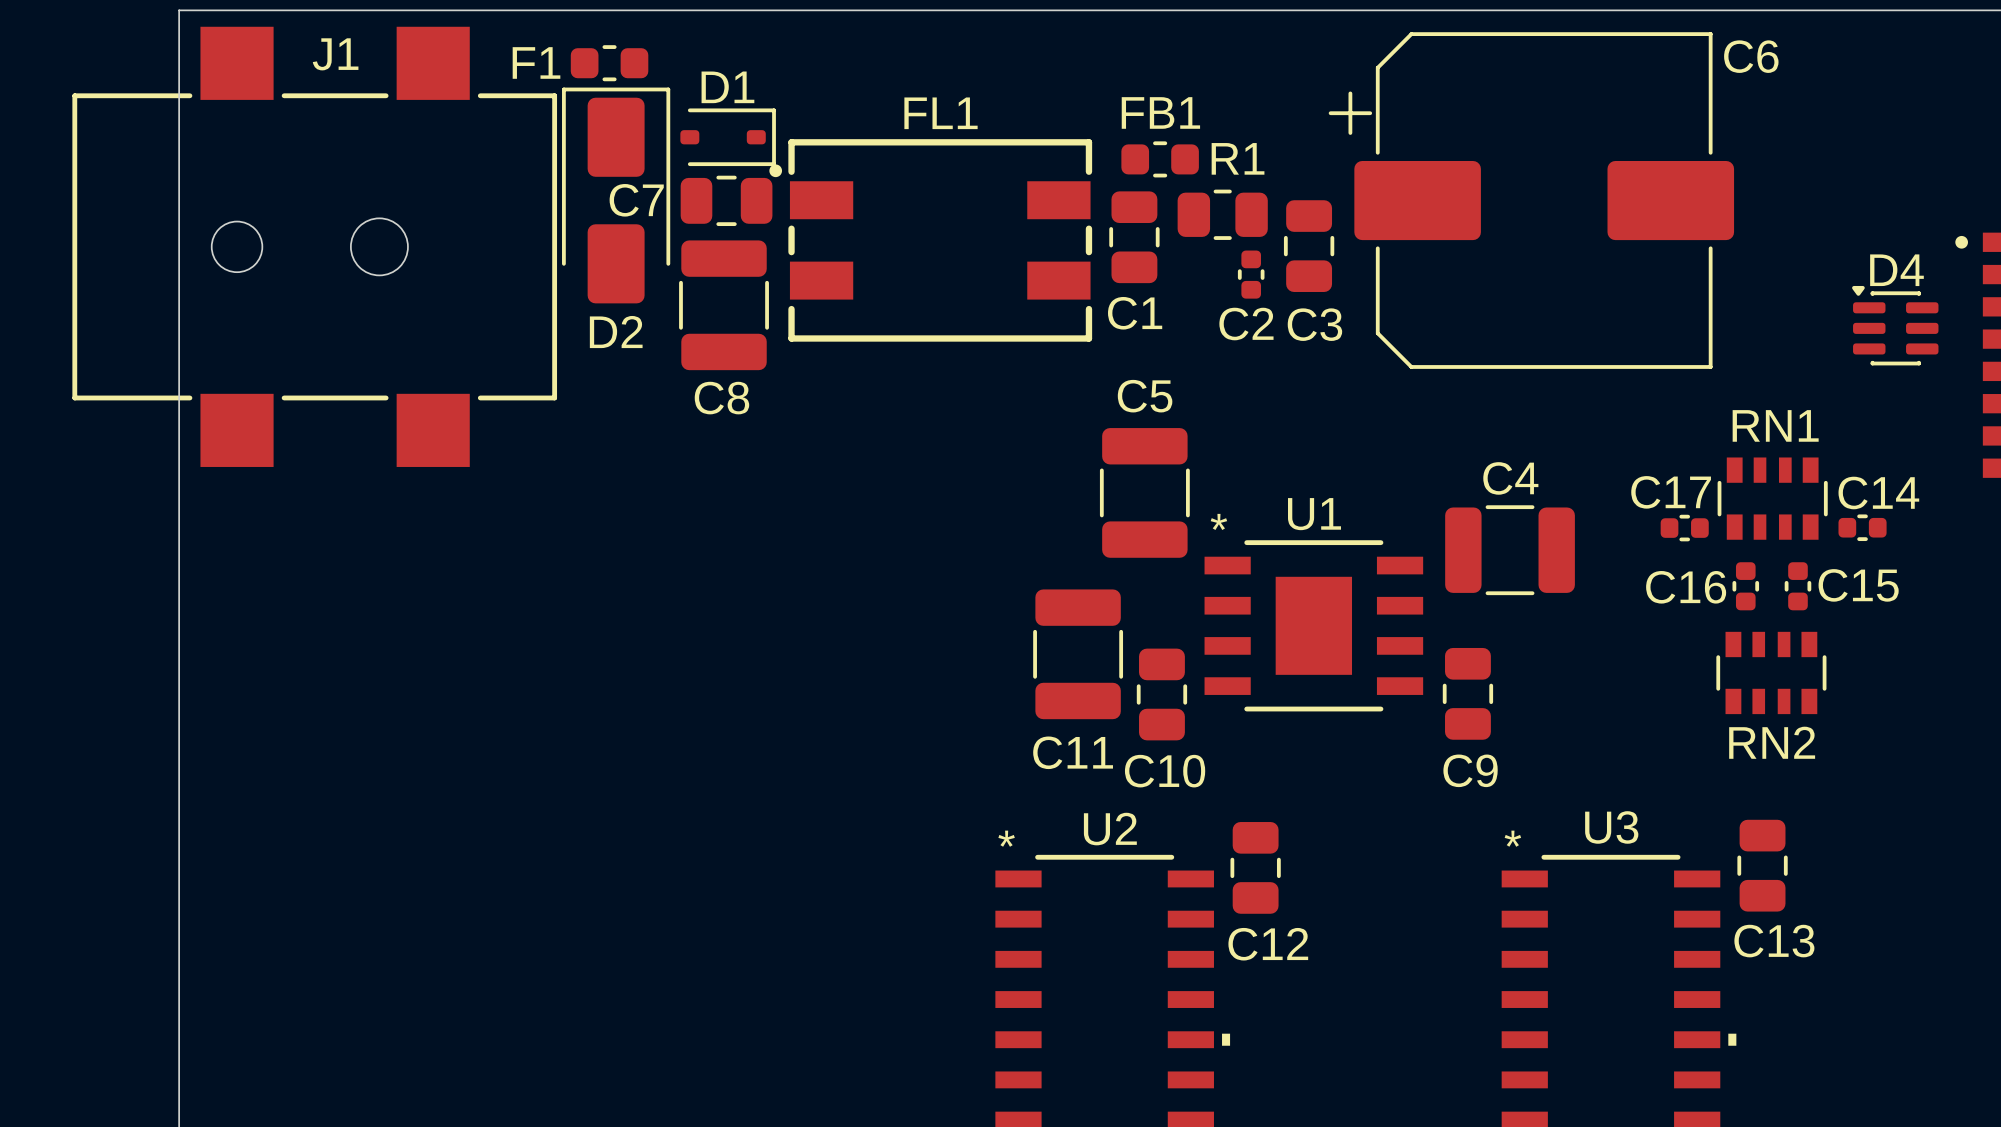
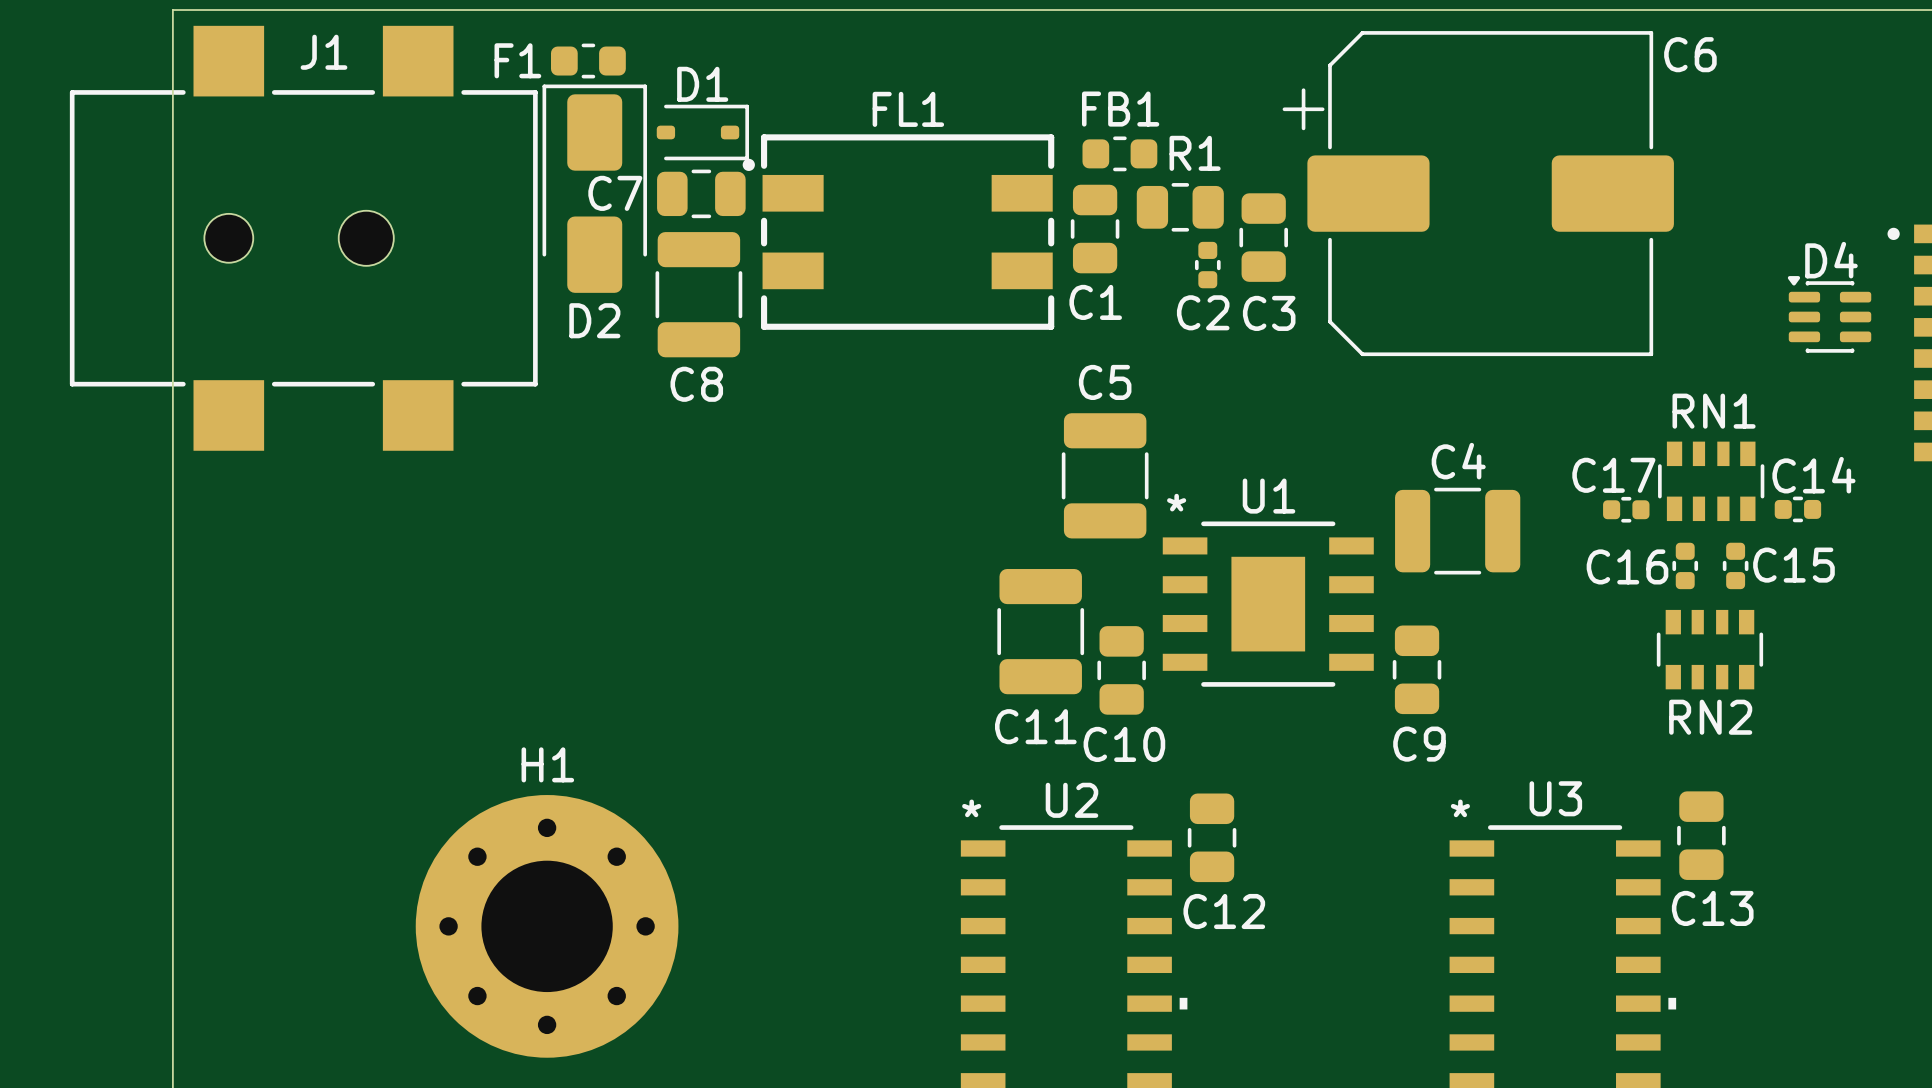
H1: none -> (547, 926)

